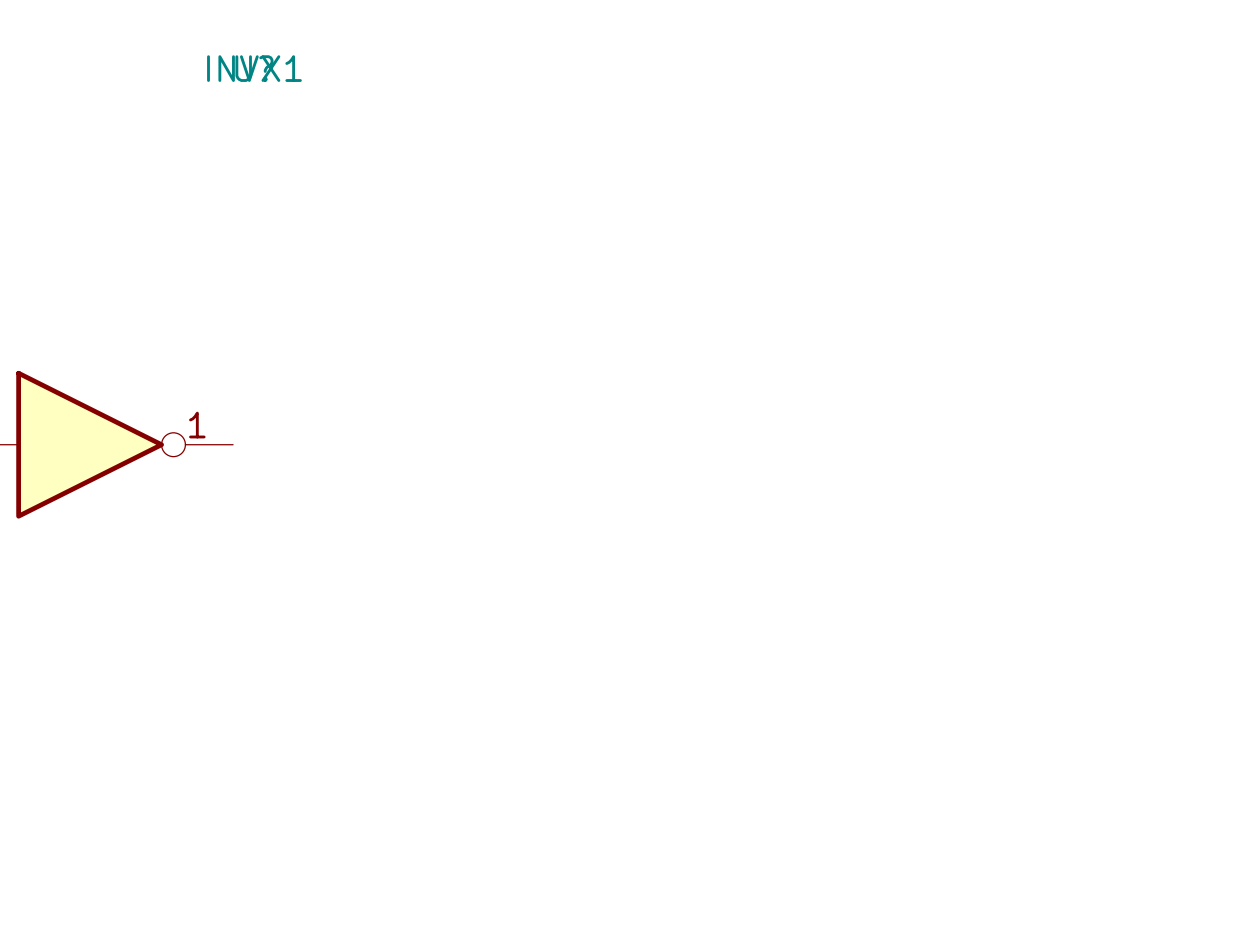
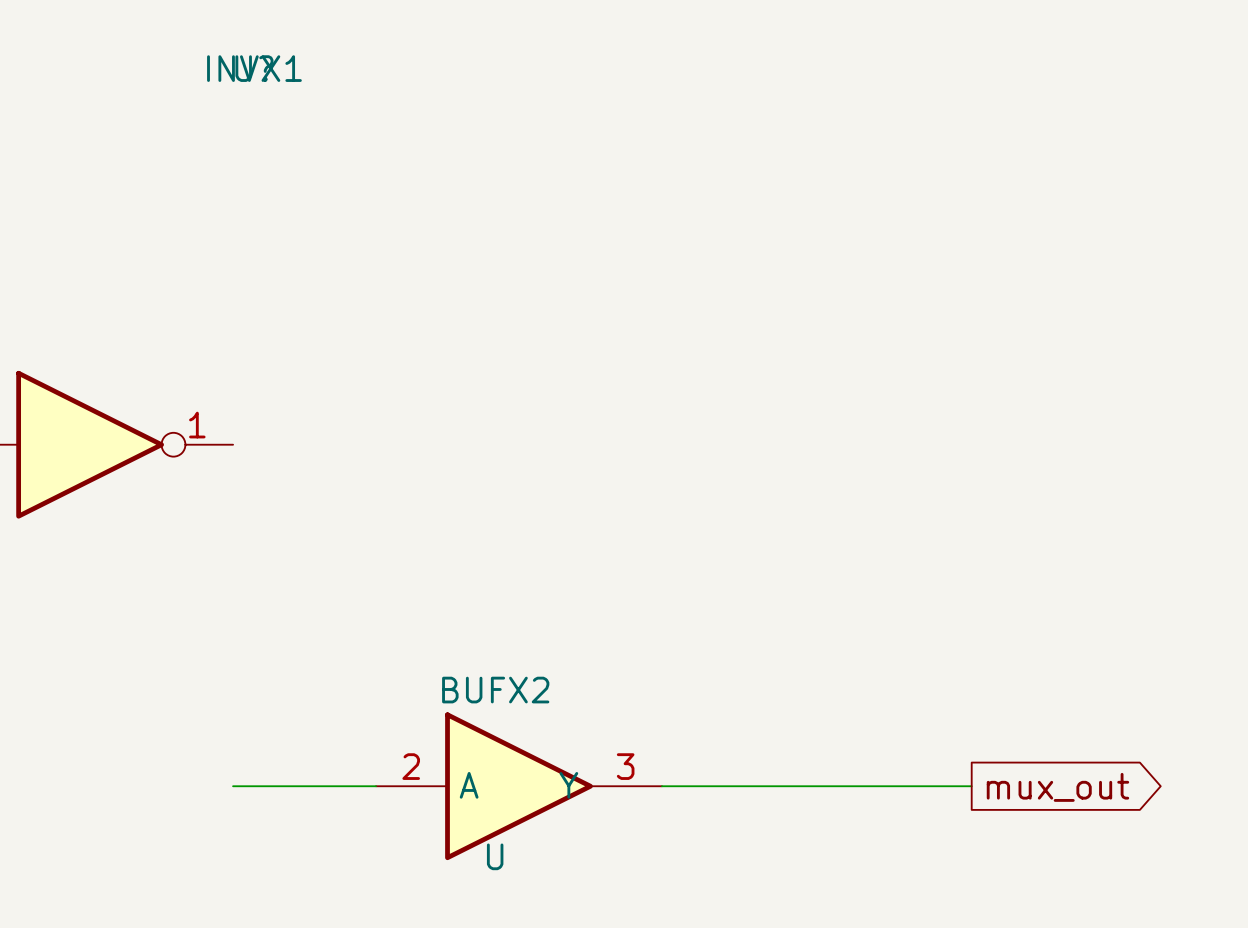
wire: none -> (233, 786) (376, 786)
U: none -> BUFX2 (518, 786)
wire: none -> (661, 786) (971, 786)
global label: none -> mux_out (1057, 787)

